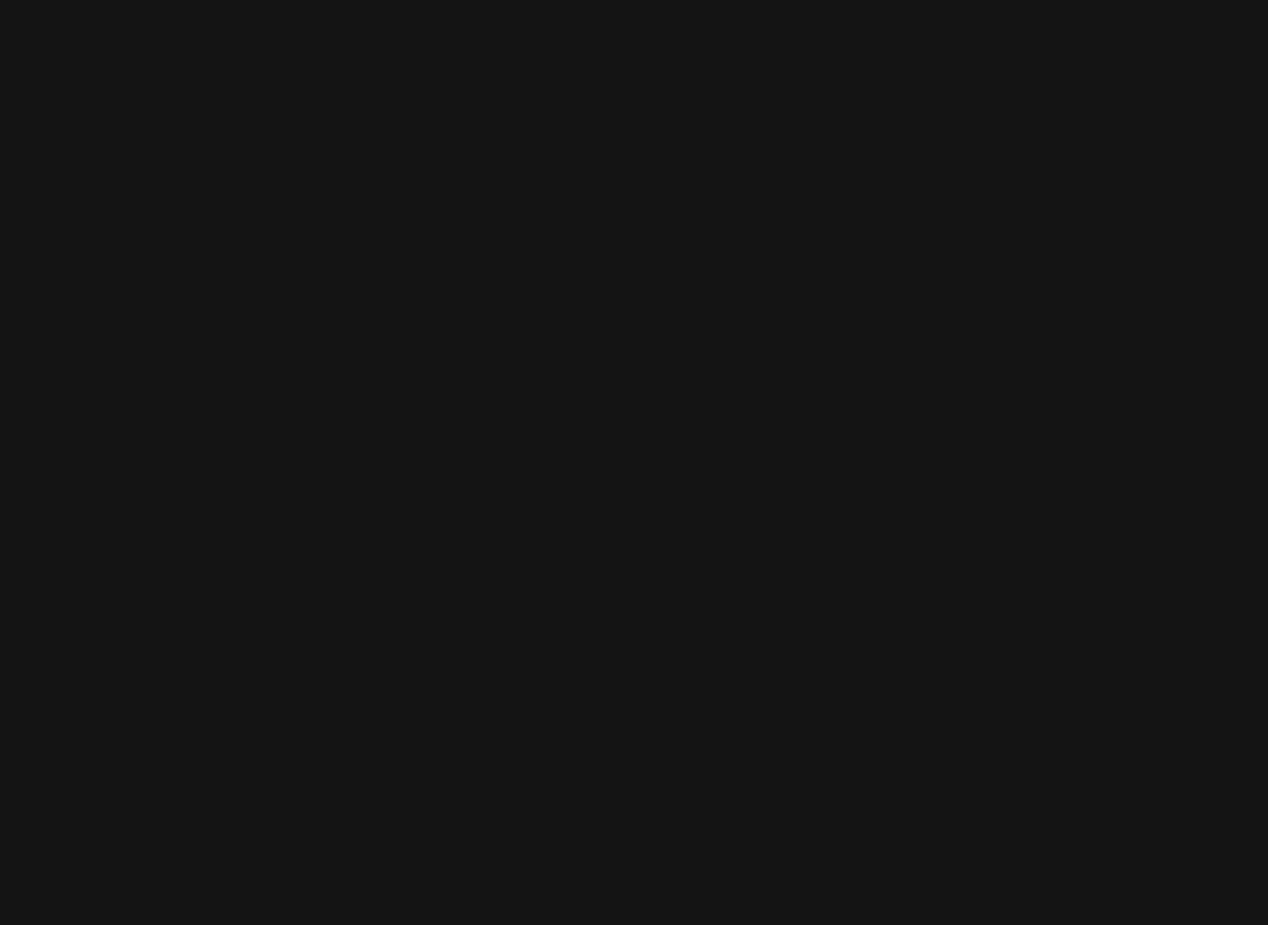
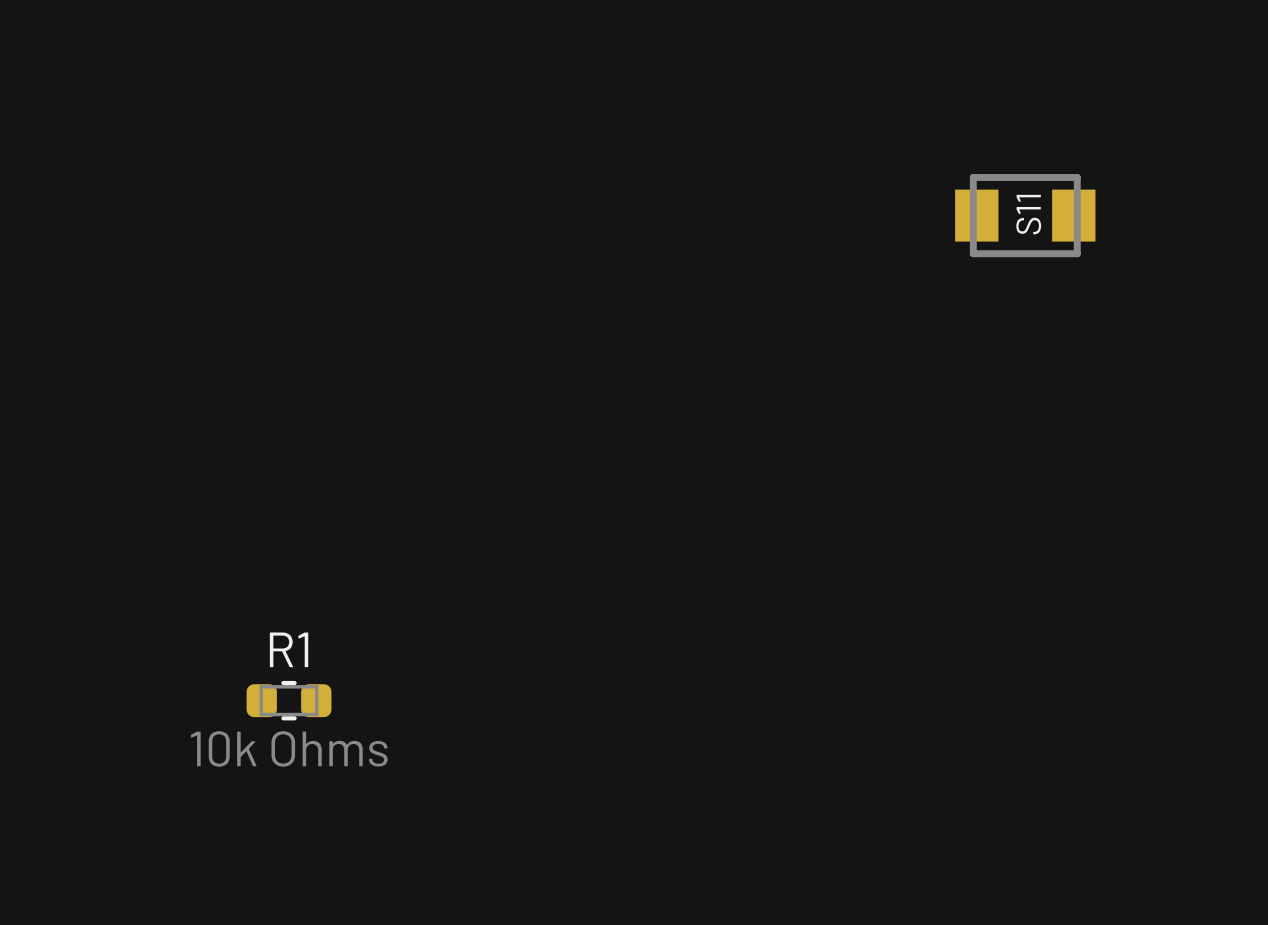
S11: none -> (1025, 215)
R1: none -> 10k Ohms (289, 700)

